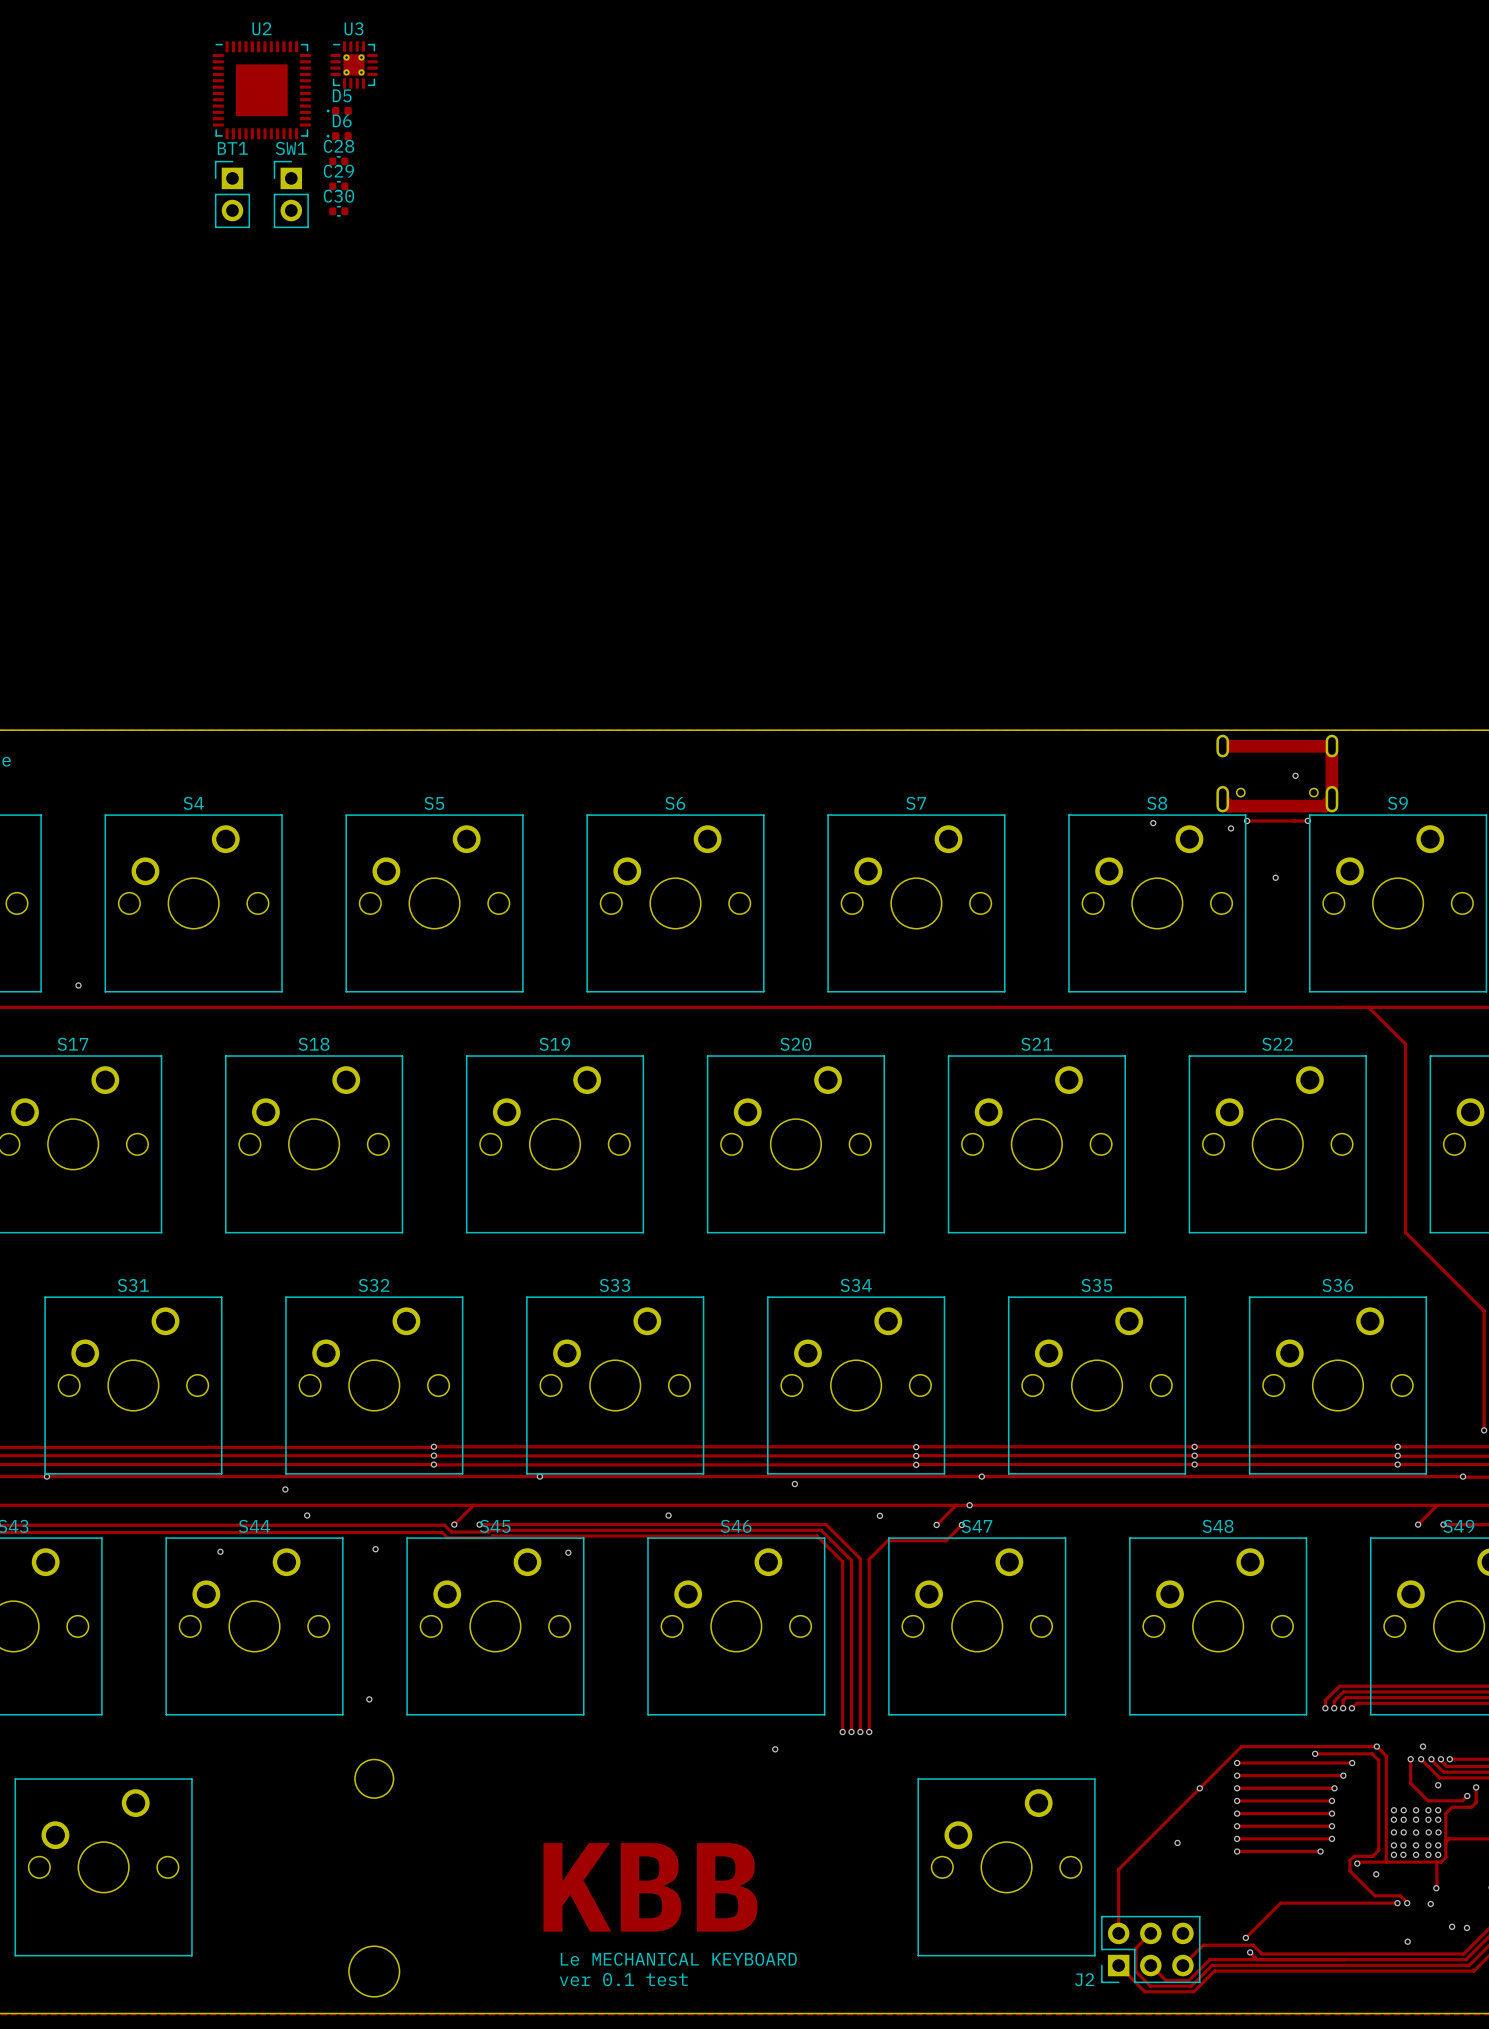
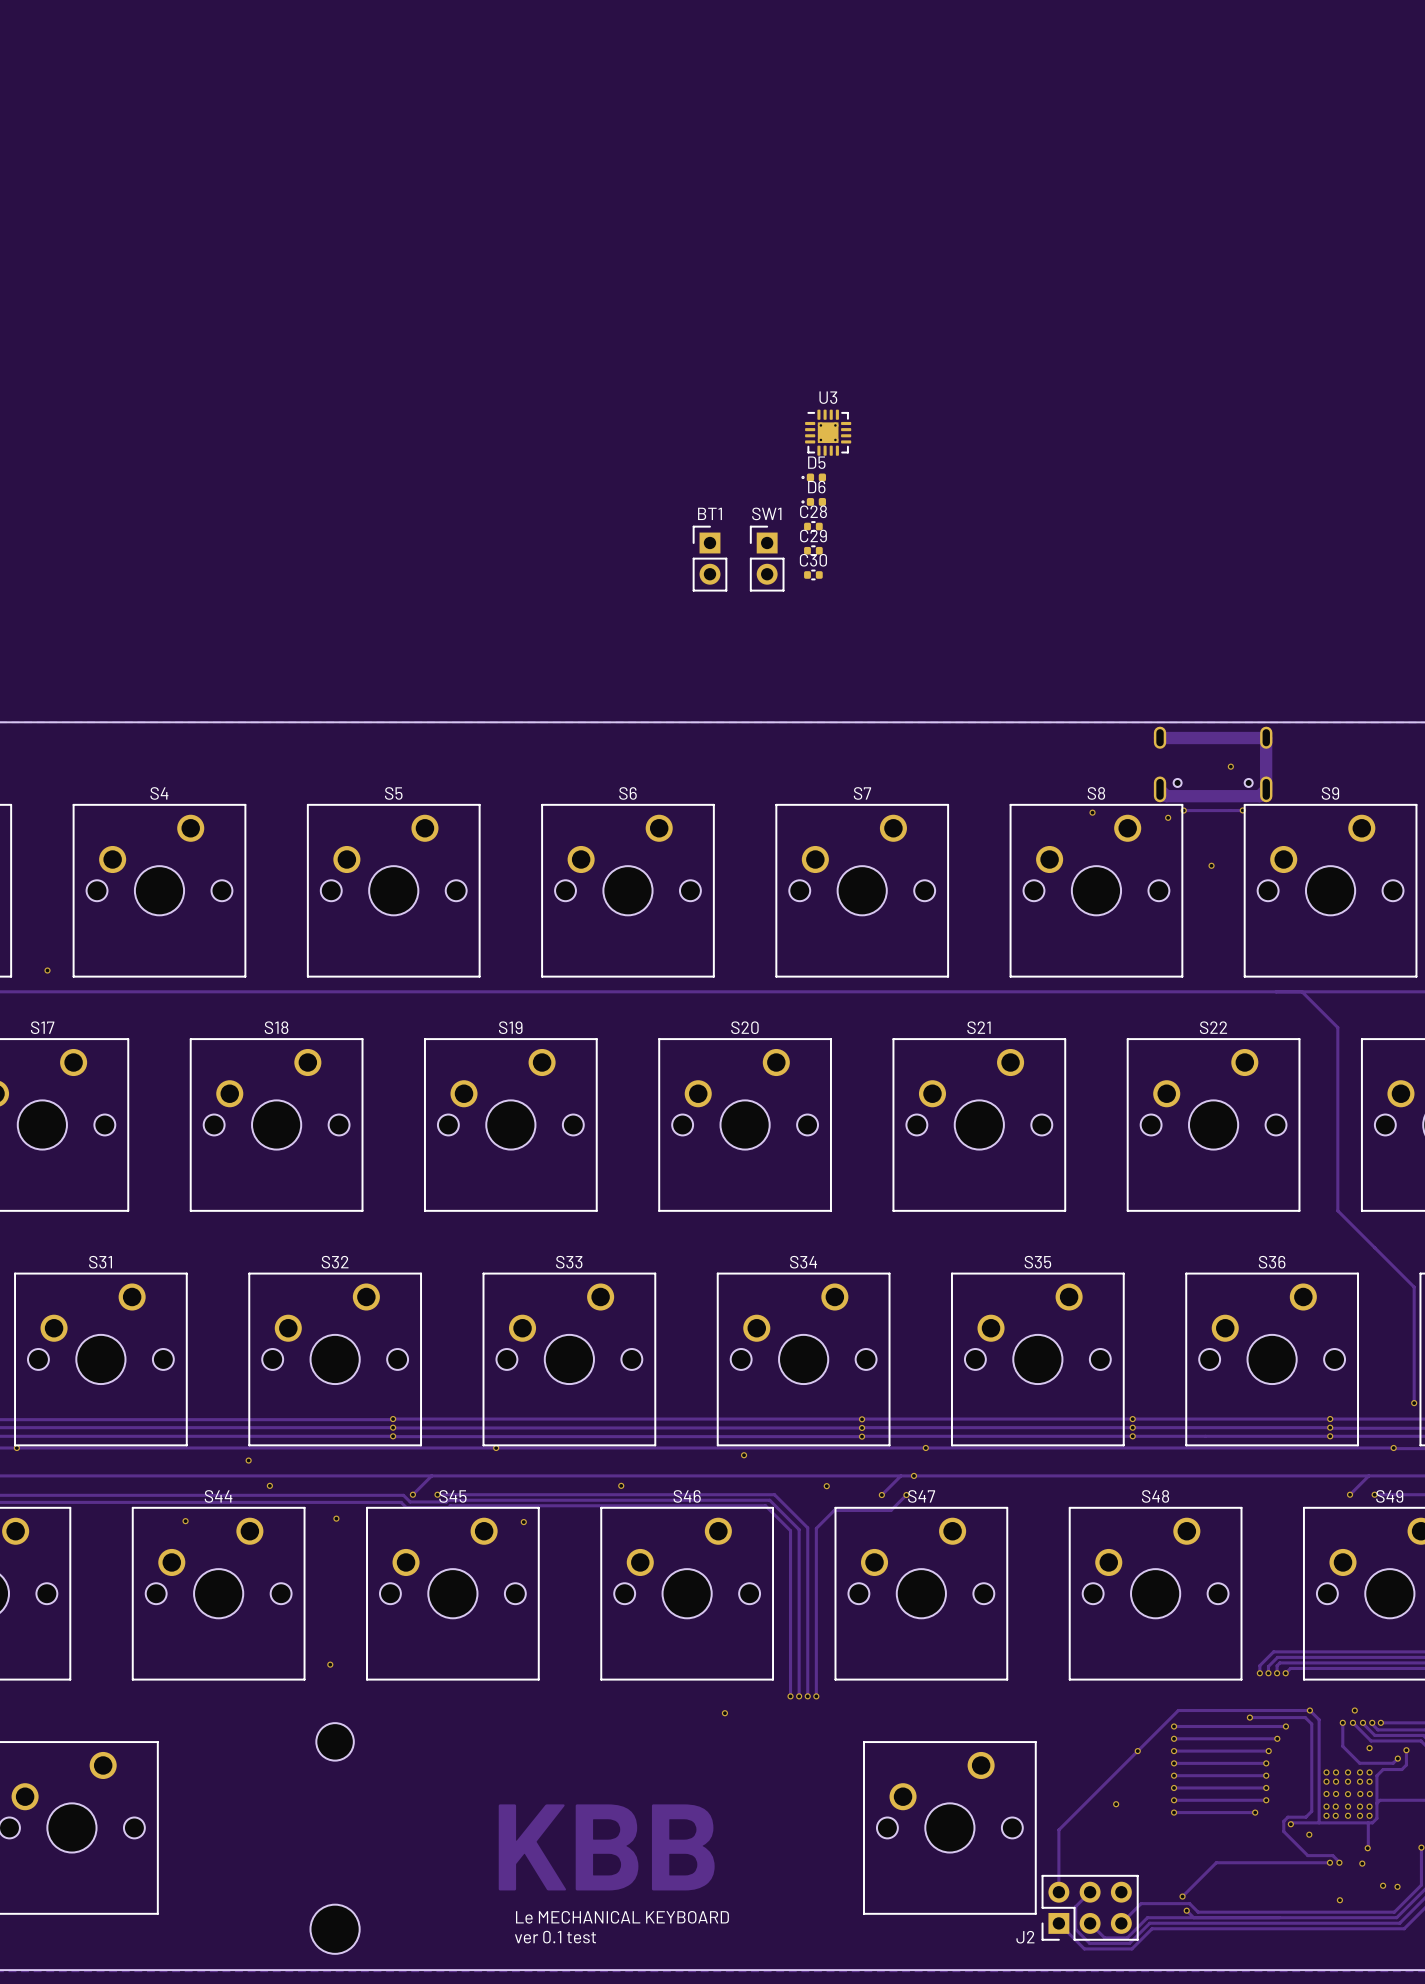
U3 position: (354, 64) -> (828, 432)
U2: (261, 90) -> none
D5 position: (339, 111) -> (813, 477)
D6 position: (339, 136) -> (813, 501)
C28 position: (338, 161) -> (813, 526)
C29 position: (338, 186) -> (813, 550)
BT1 position: (232, 194) -> (709, 558)
SW1 position: (291, 194) -> (767, 558)
C30 position: (338, 211) -> (813, 574)

